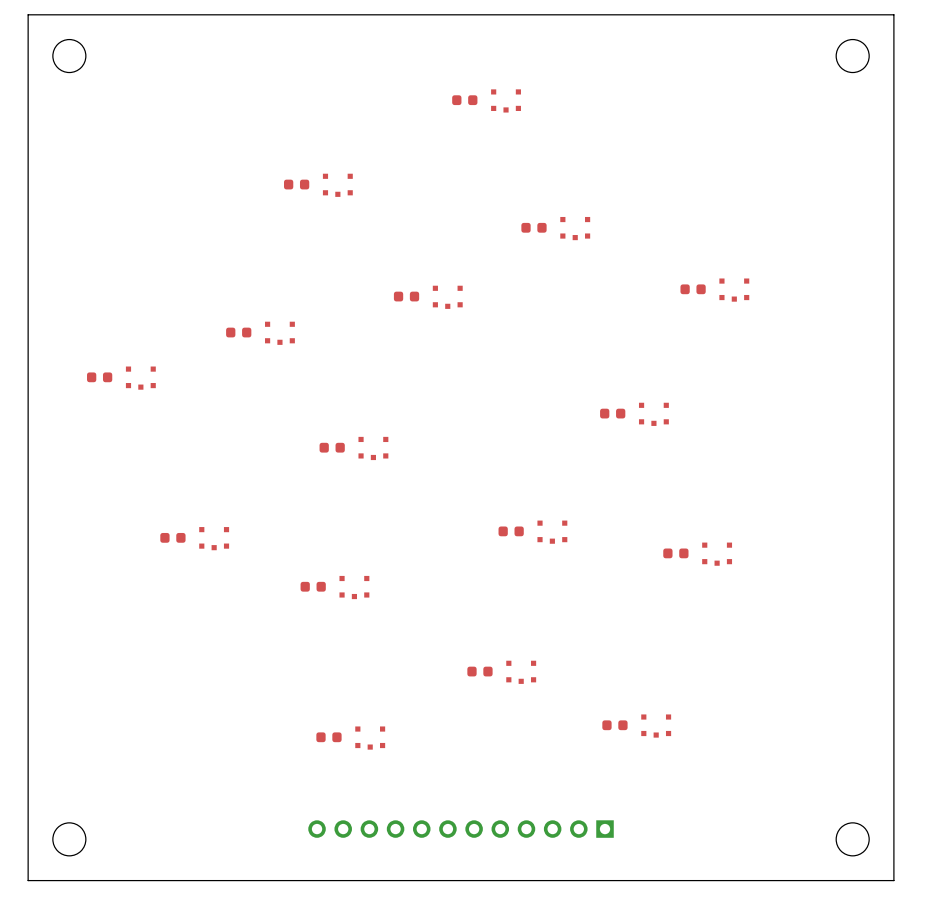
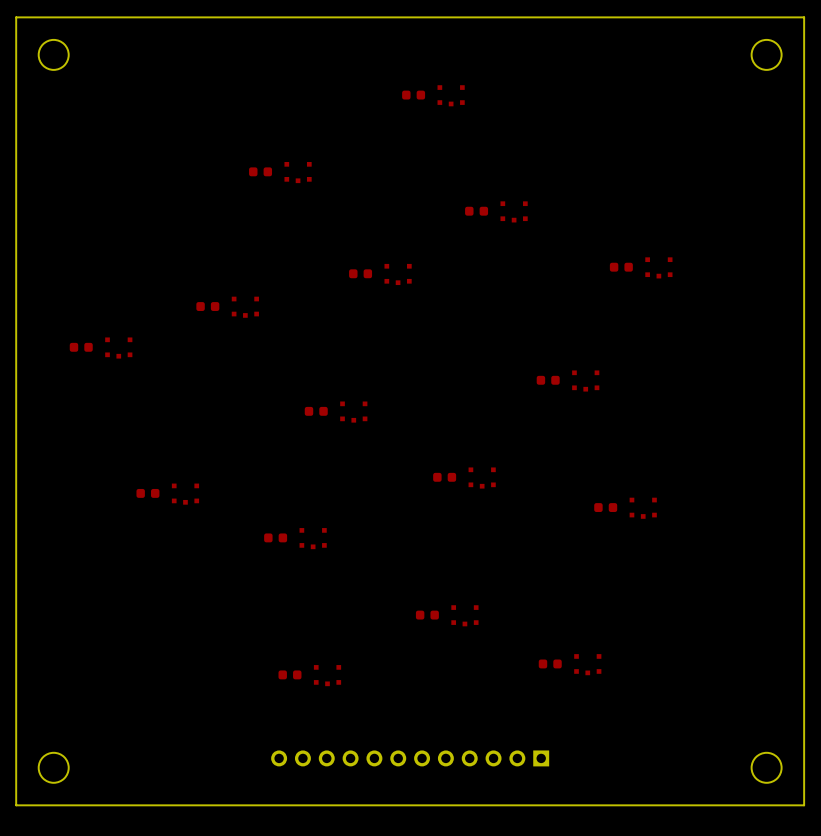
part position: (332, 447) -> (316, 411)
part position: (373, 448) -> (353, 412)
part position: (511, 531) -> (444, 477)
part position: (552, 532) -> (482, 478)

